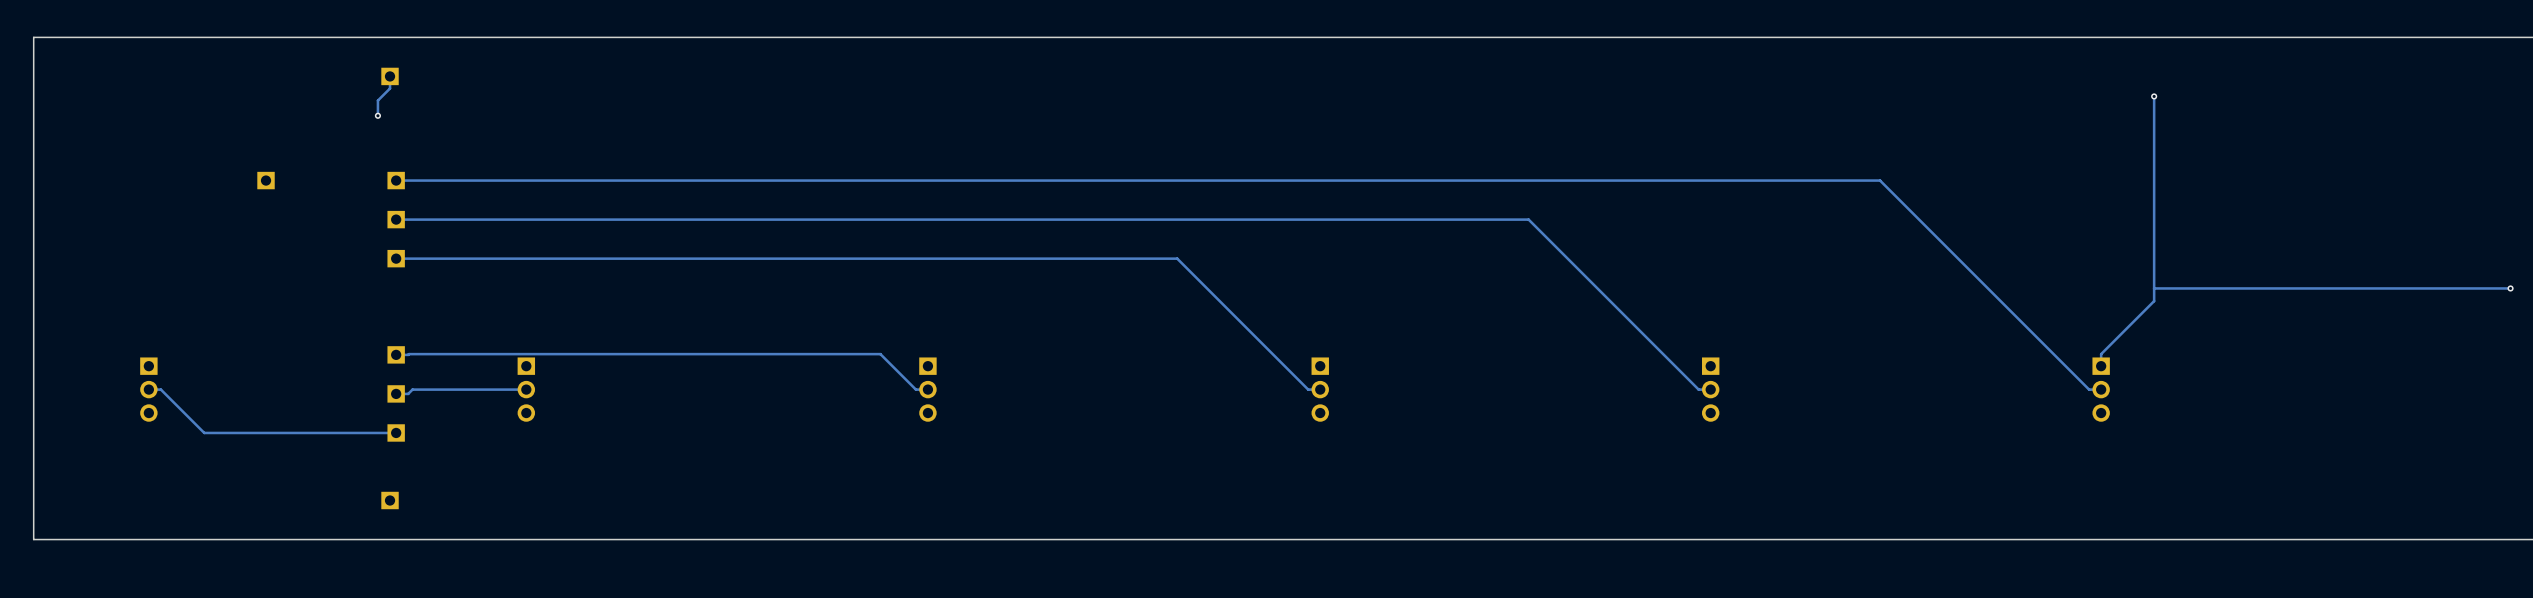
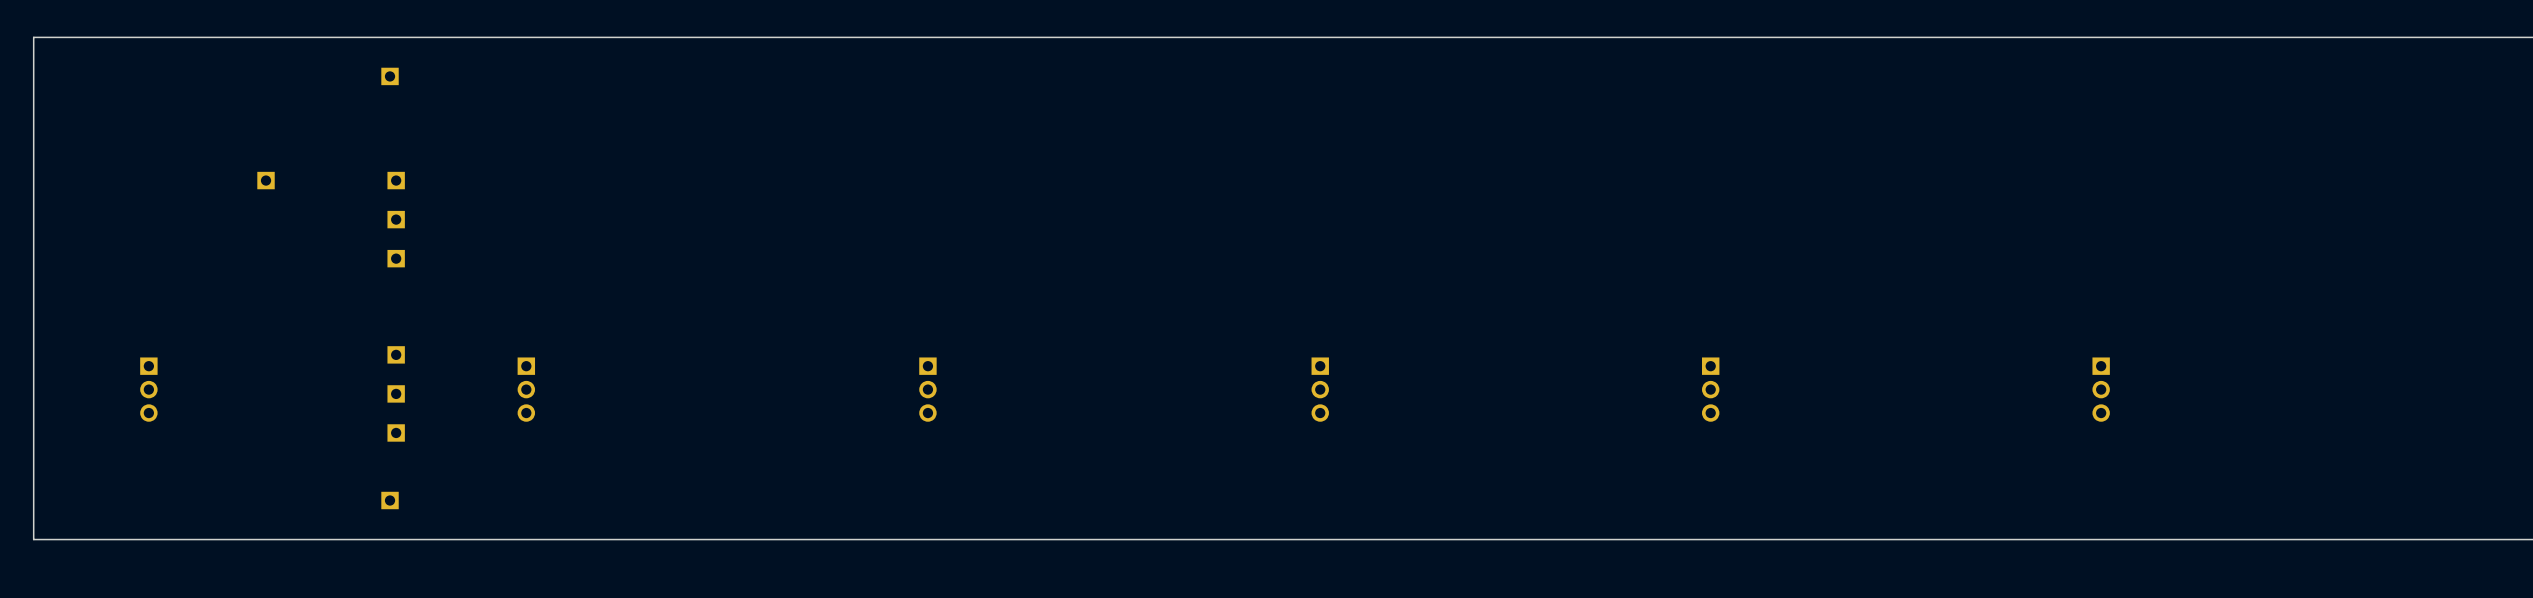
track: (390, 76) (390, 88) (377, 100) (377, 115) -> none
track: (2154, 96) (2154, 301) (2101, 354) (2101, 366) -> none
via: (2154, 96) -> none
via: (377, 115) -> none
track: (396, 180) (1880, 180) (2089, 389) (2101, 389) -> none
track: (396, 219) (1528, 219) (1698, 389) (1710, 389) -> none
track: (396, 258) (1177, 258) (1308, 389) (1320, 389) -> none
track: (2510, 288) (2154, 288) -> none
via: (2510, 288) -> none
track: (396, 354) (880, 354) (915, 389) (927, 389) -> none
track: (148, 389) (160, 389) (204, 432) (396, 432) -> none
track: (526, 389) (412, 389) (408, 393) (396, 393) -> none

